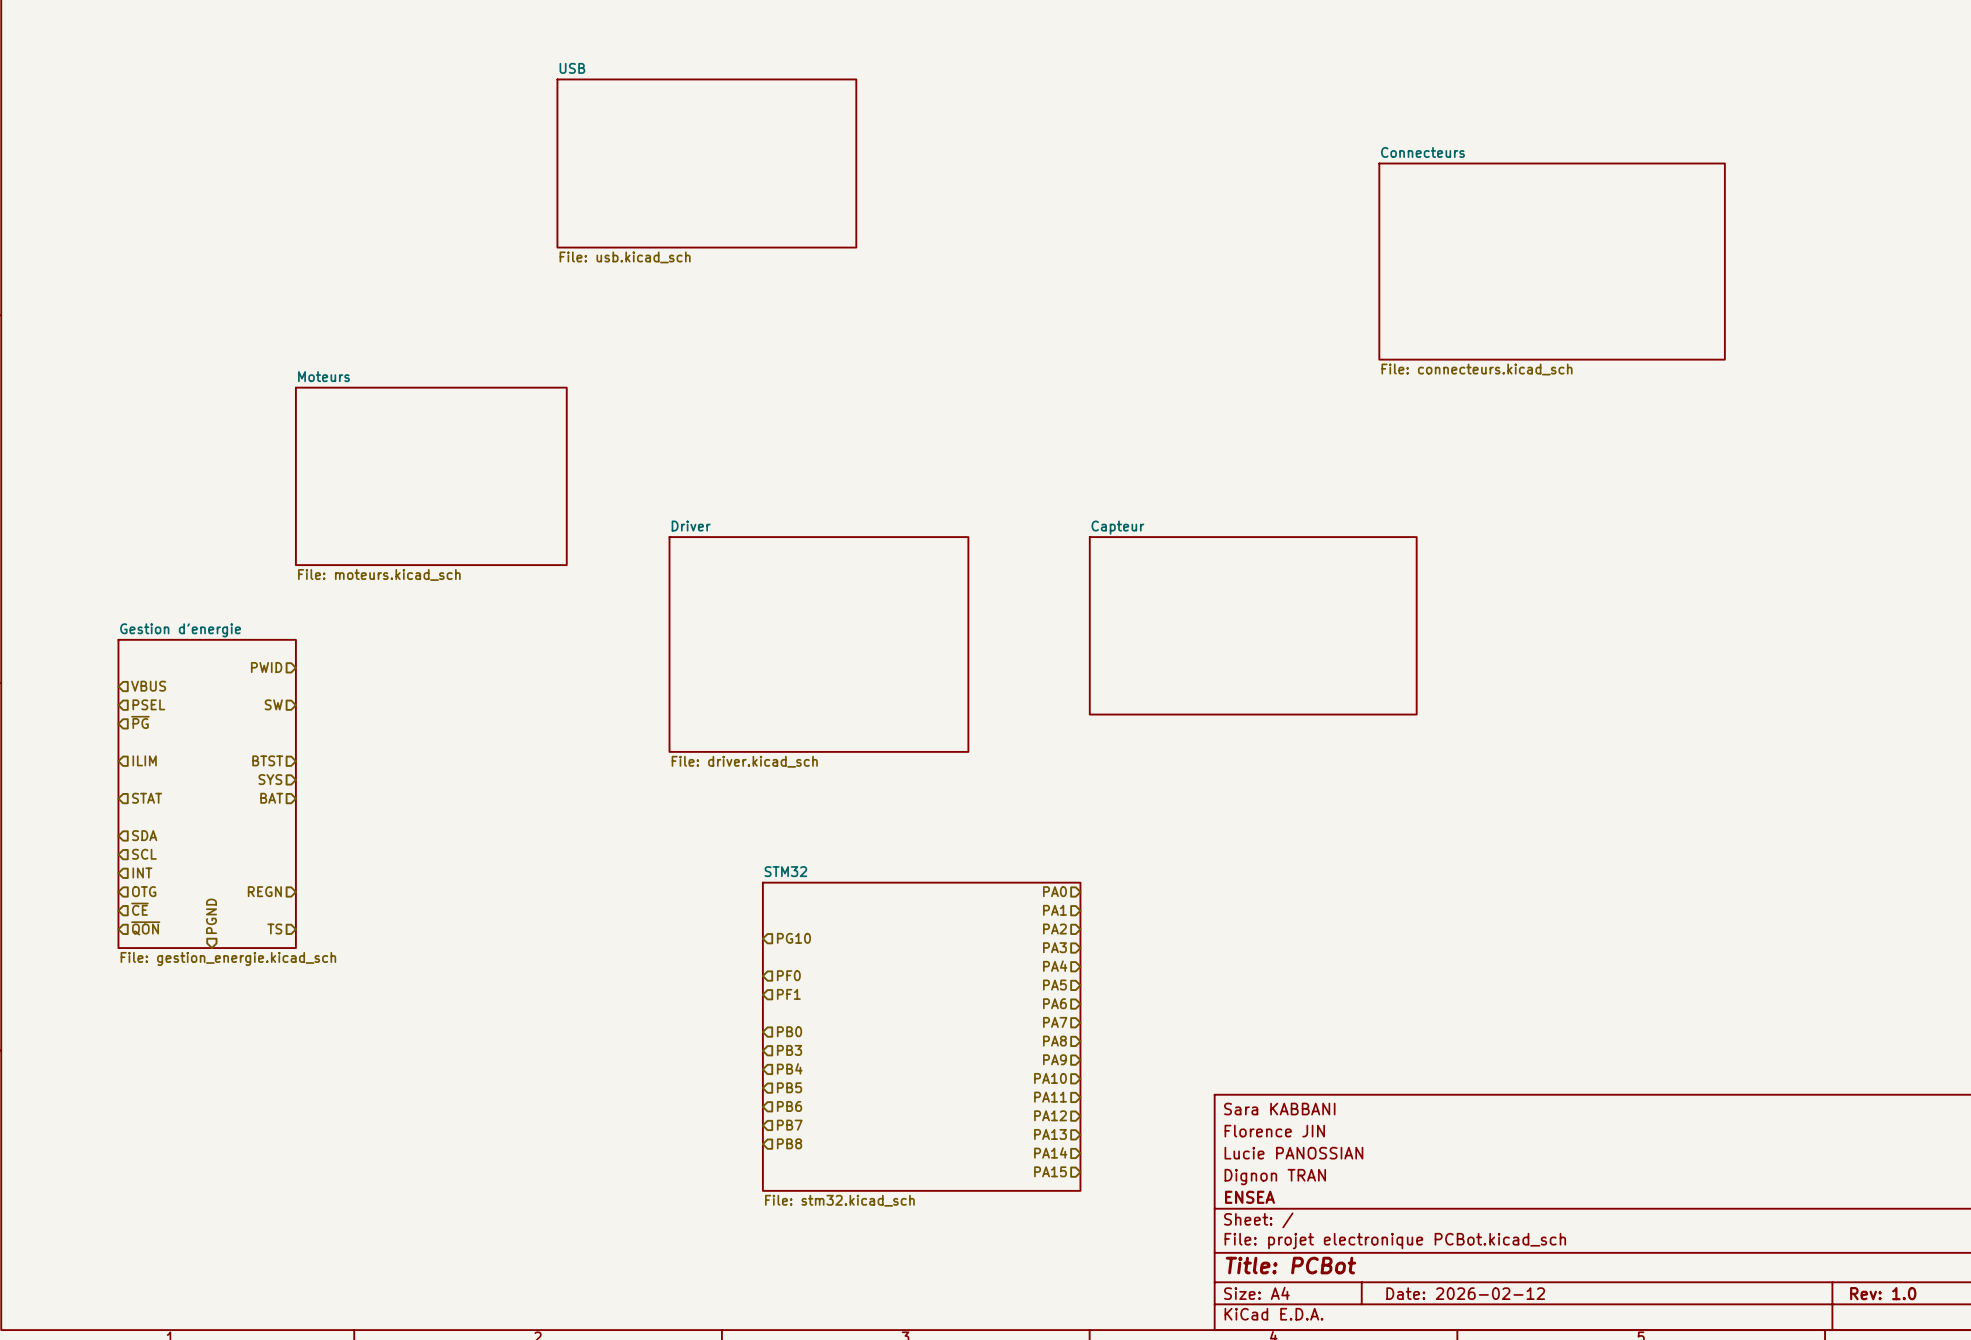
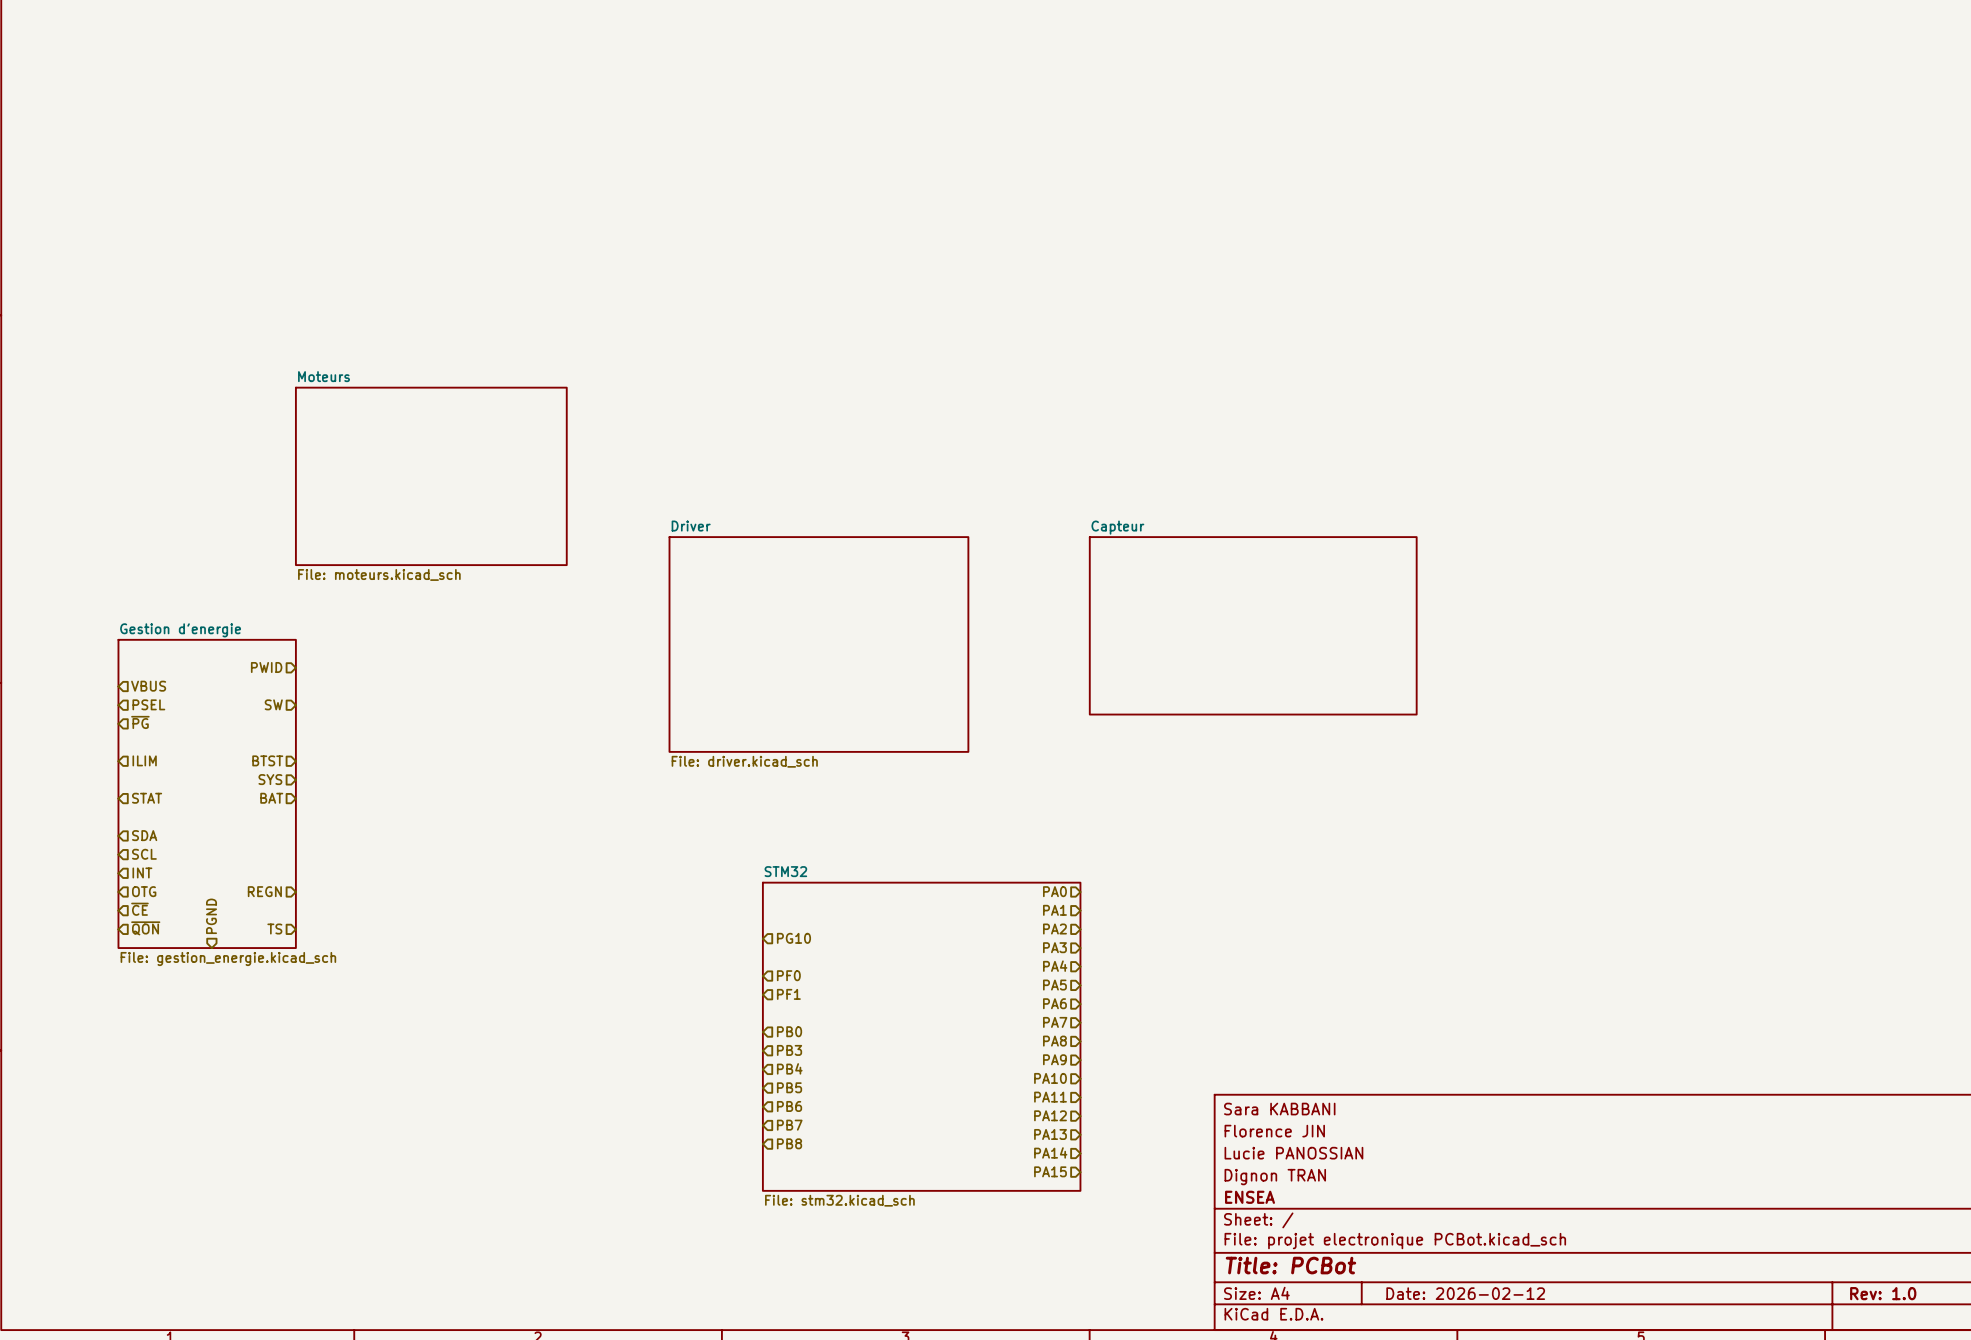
sheet USB: File: usb.kicad_sch (706, 163) -> none
sheet Connecteurs: File: connecteurs.kicad_sch (1552, 261) -> none

